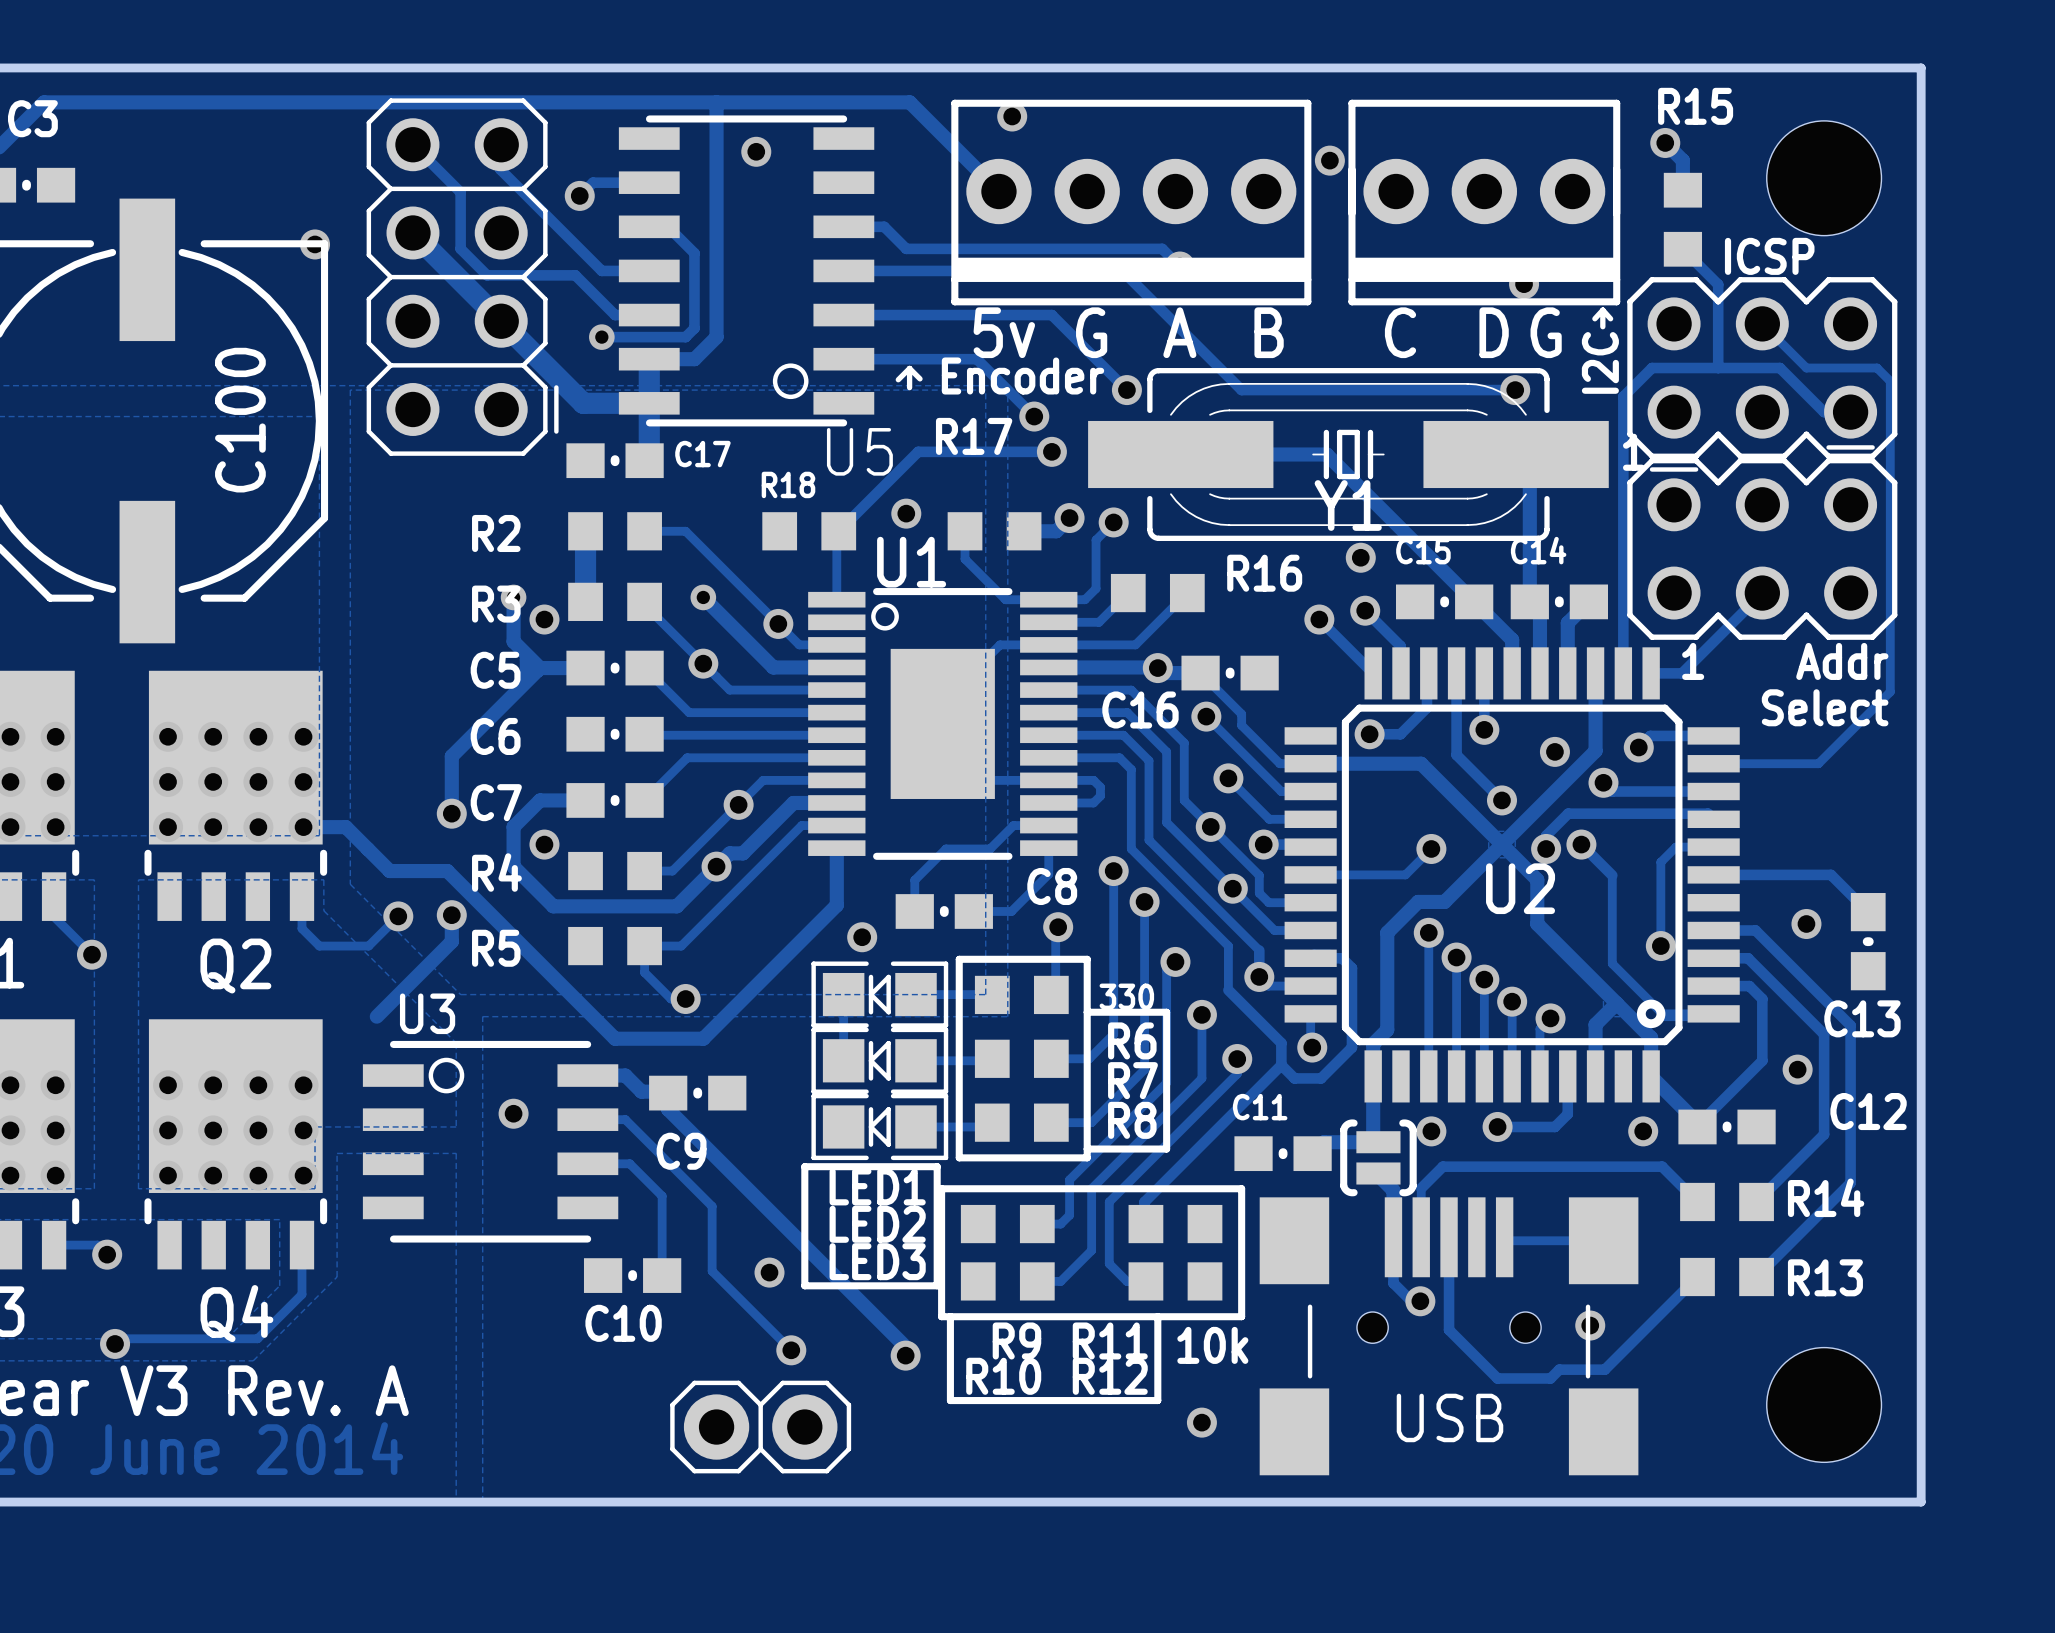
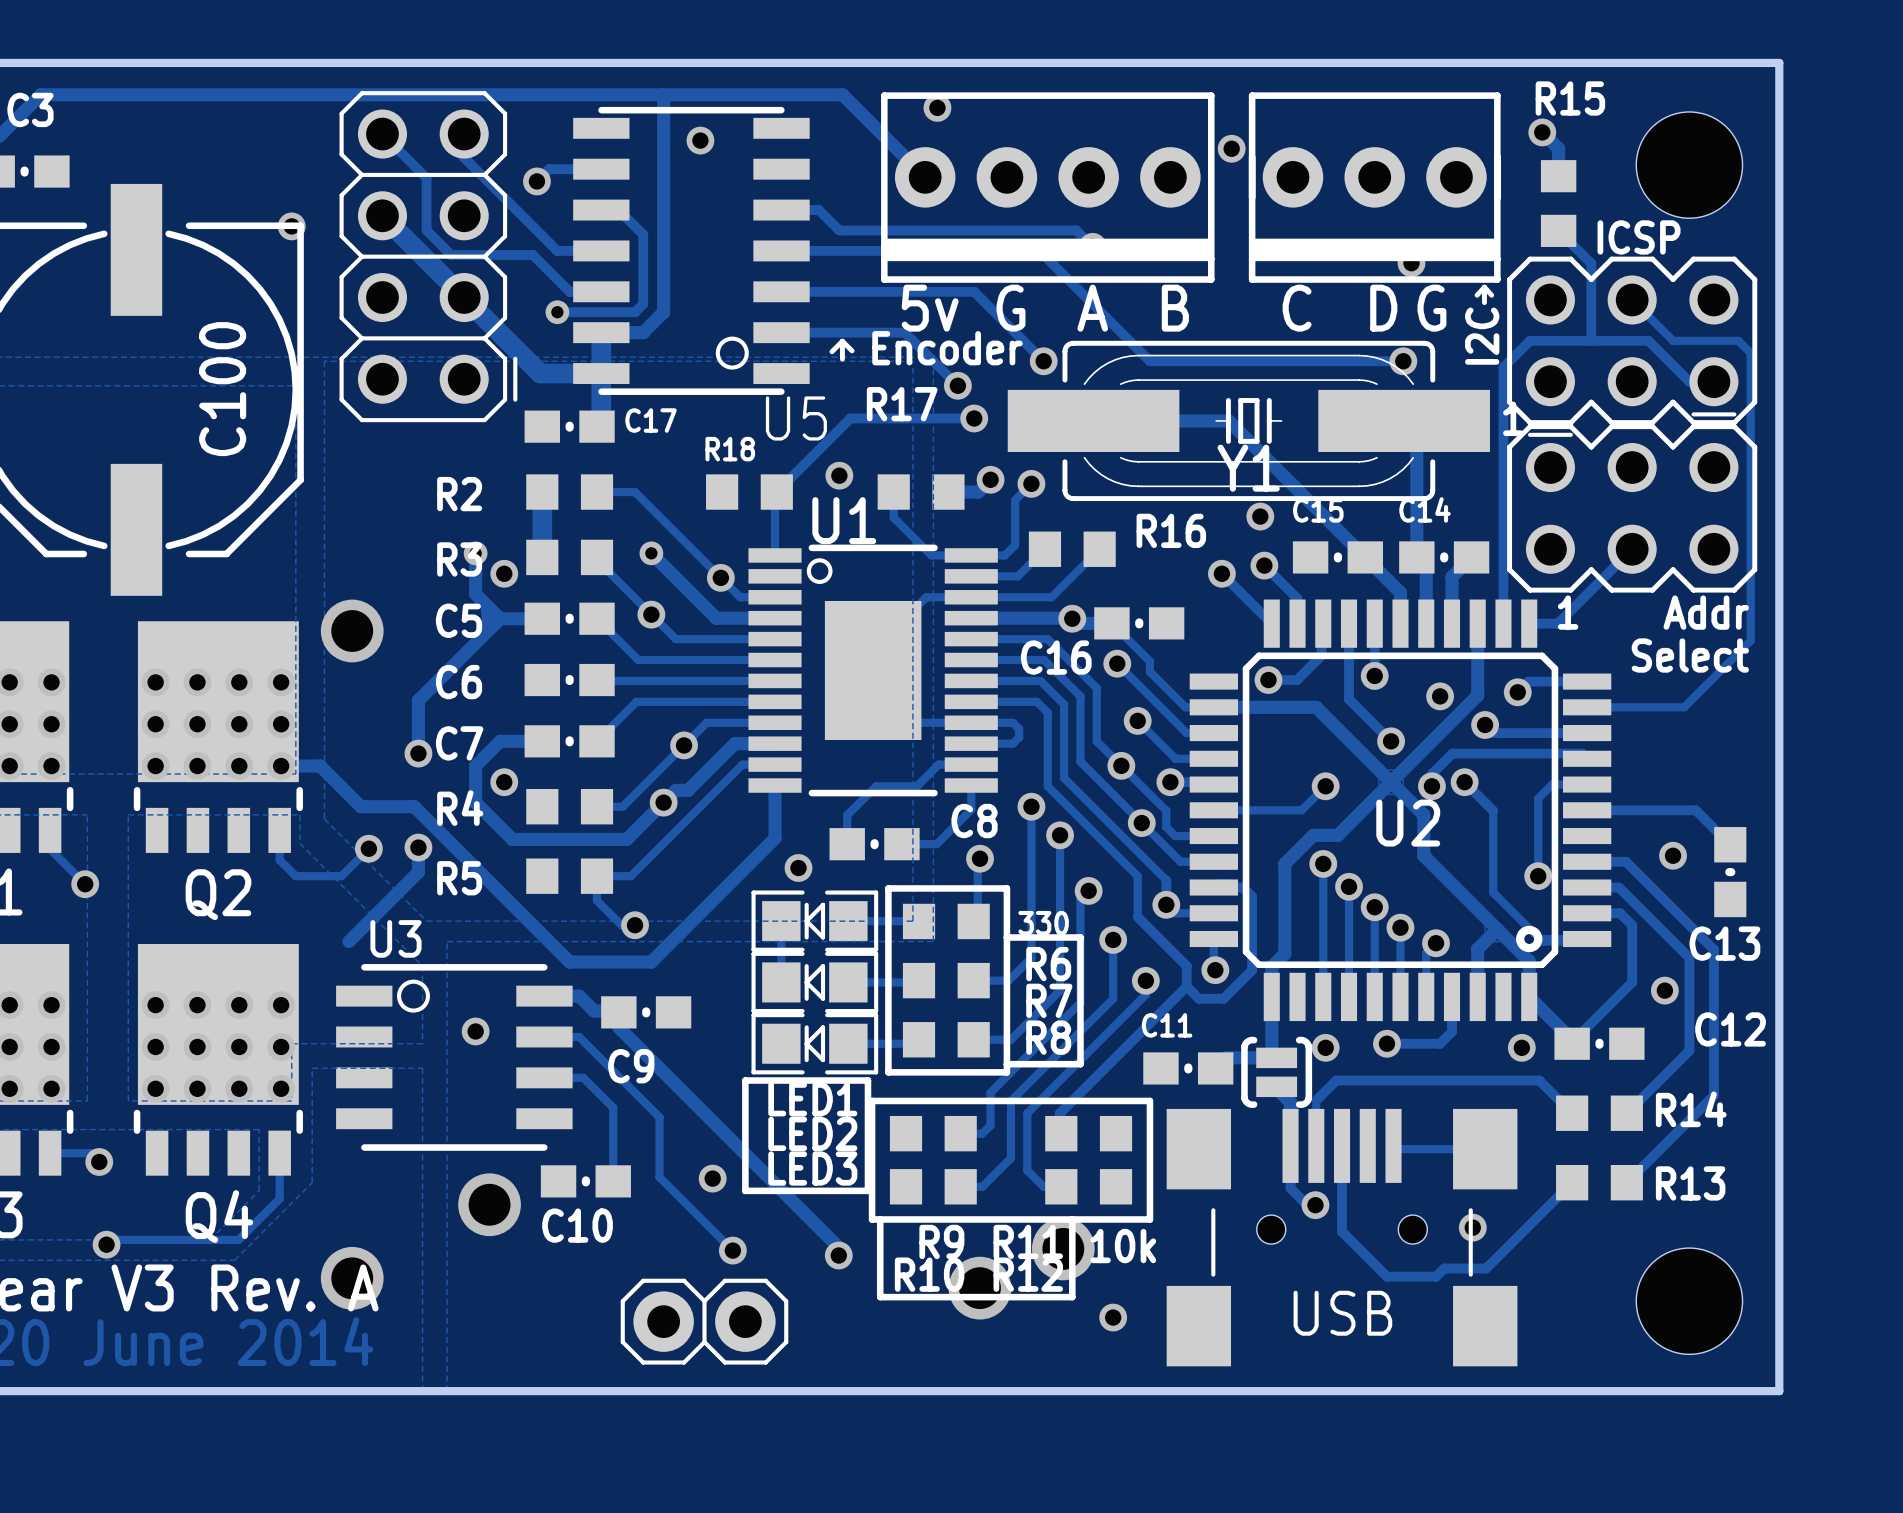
via: none -> (352, 630)
via: none -> (489, 1204)
via: none -> (1063, 1248)
via: none -> (352, 1278)
via: none -> (979, 1288)

